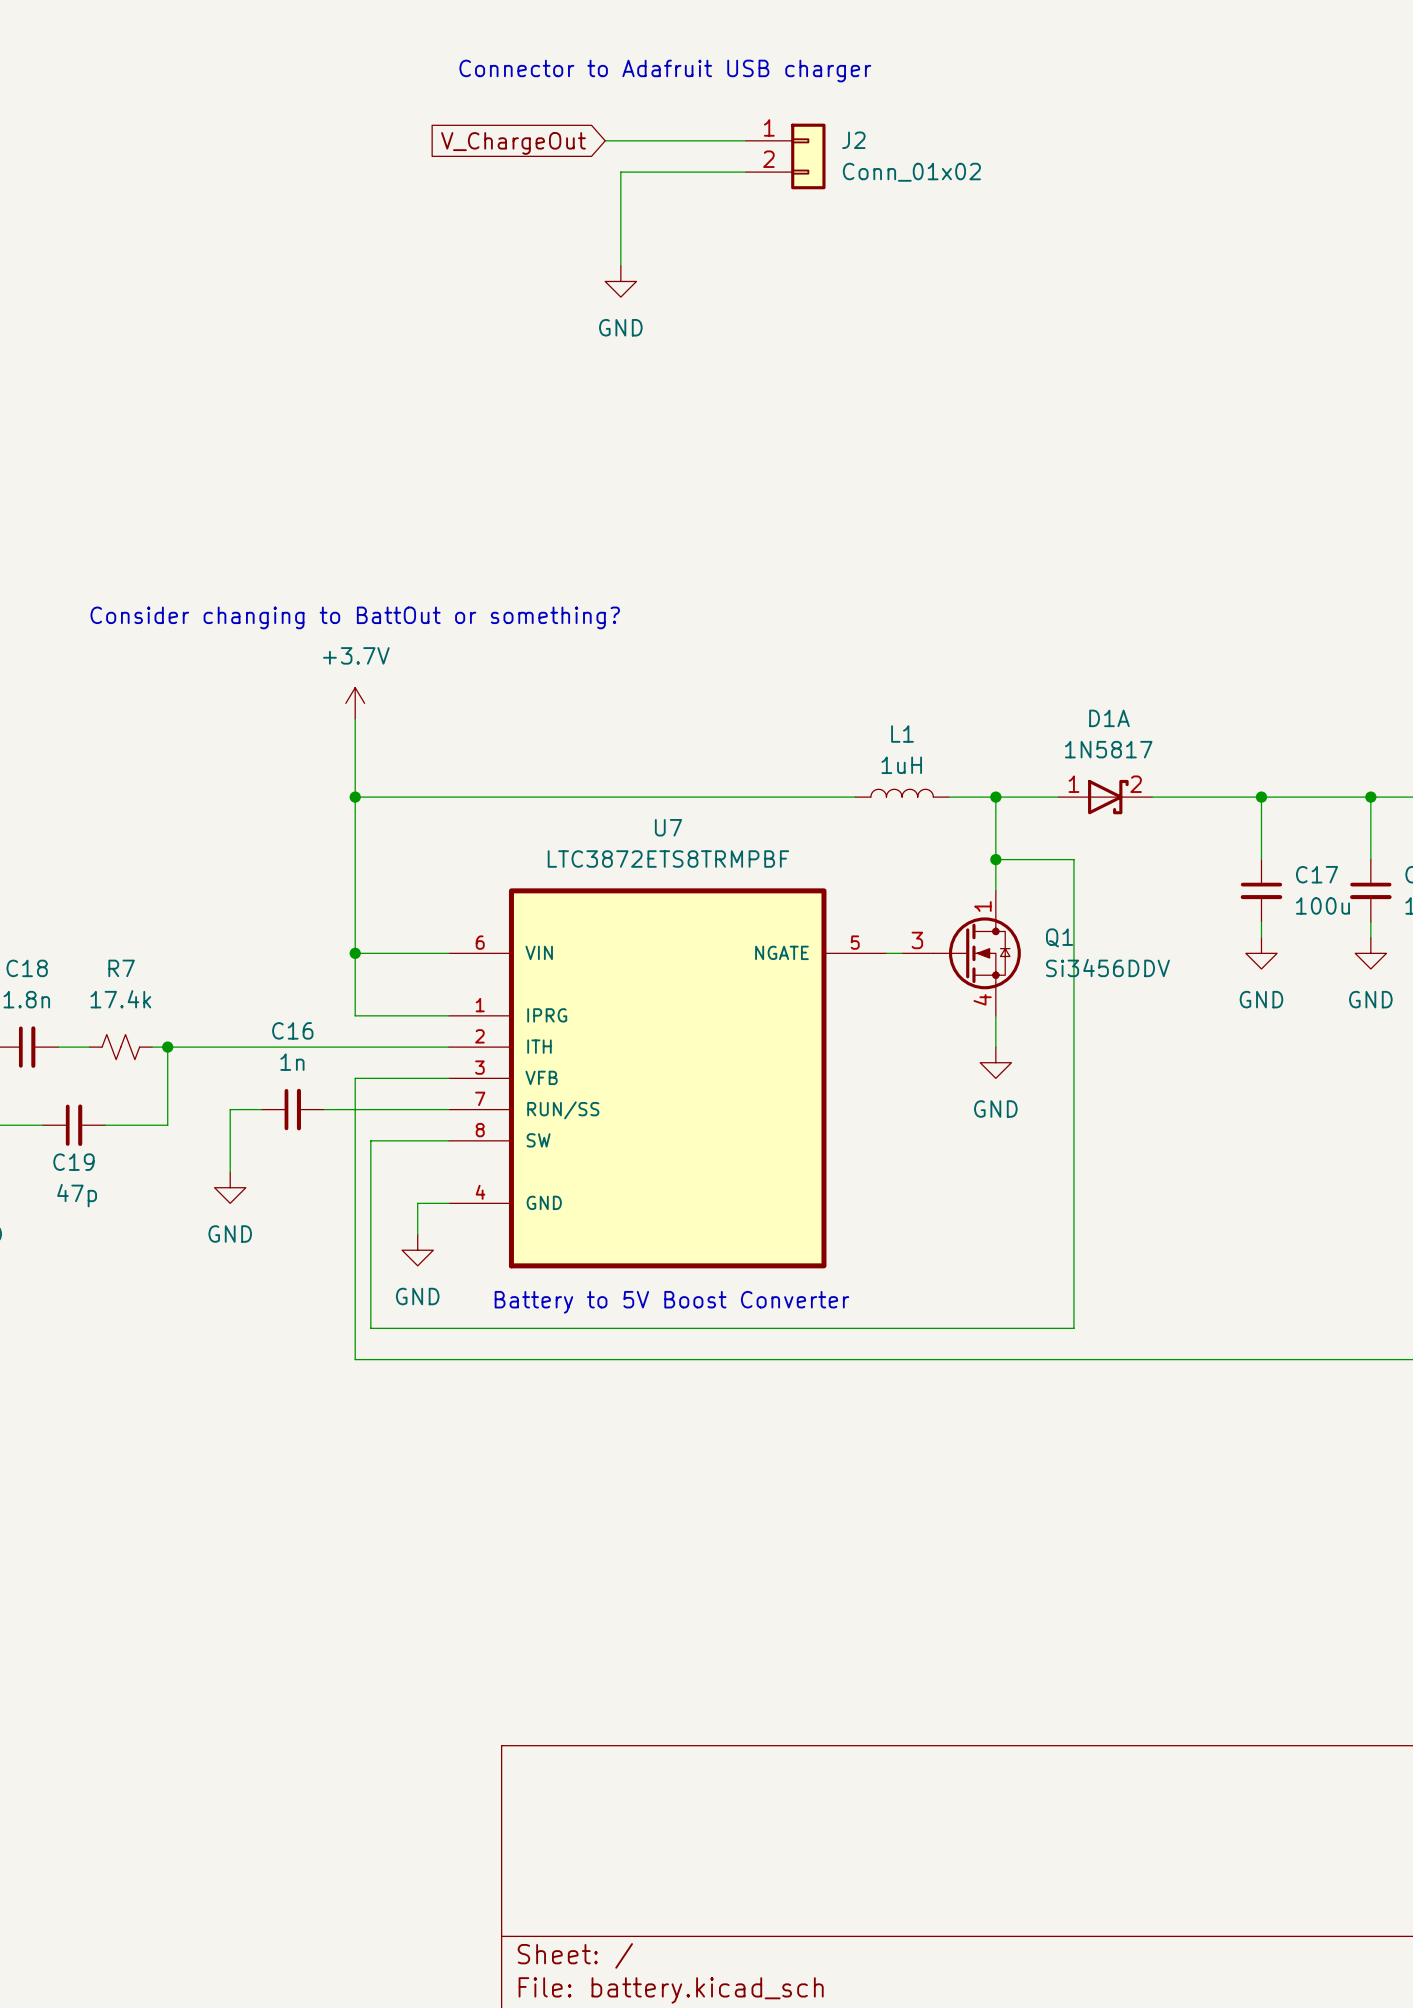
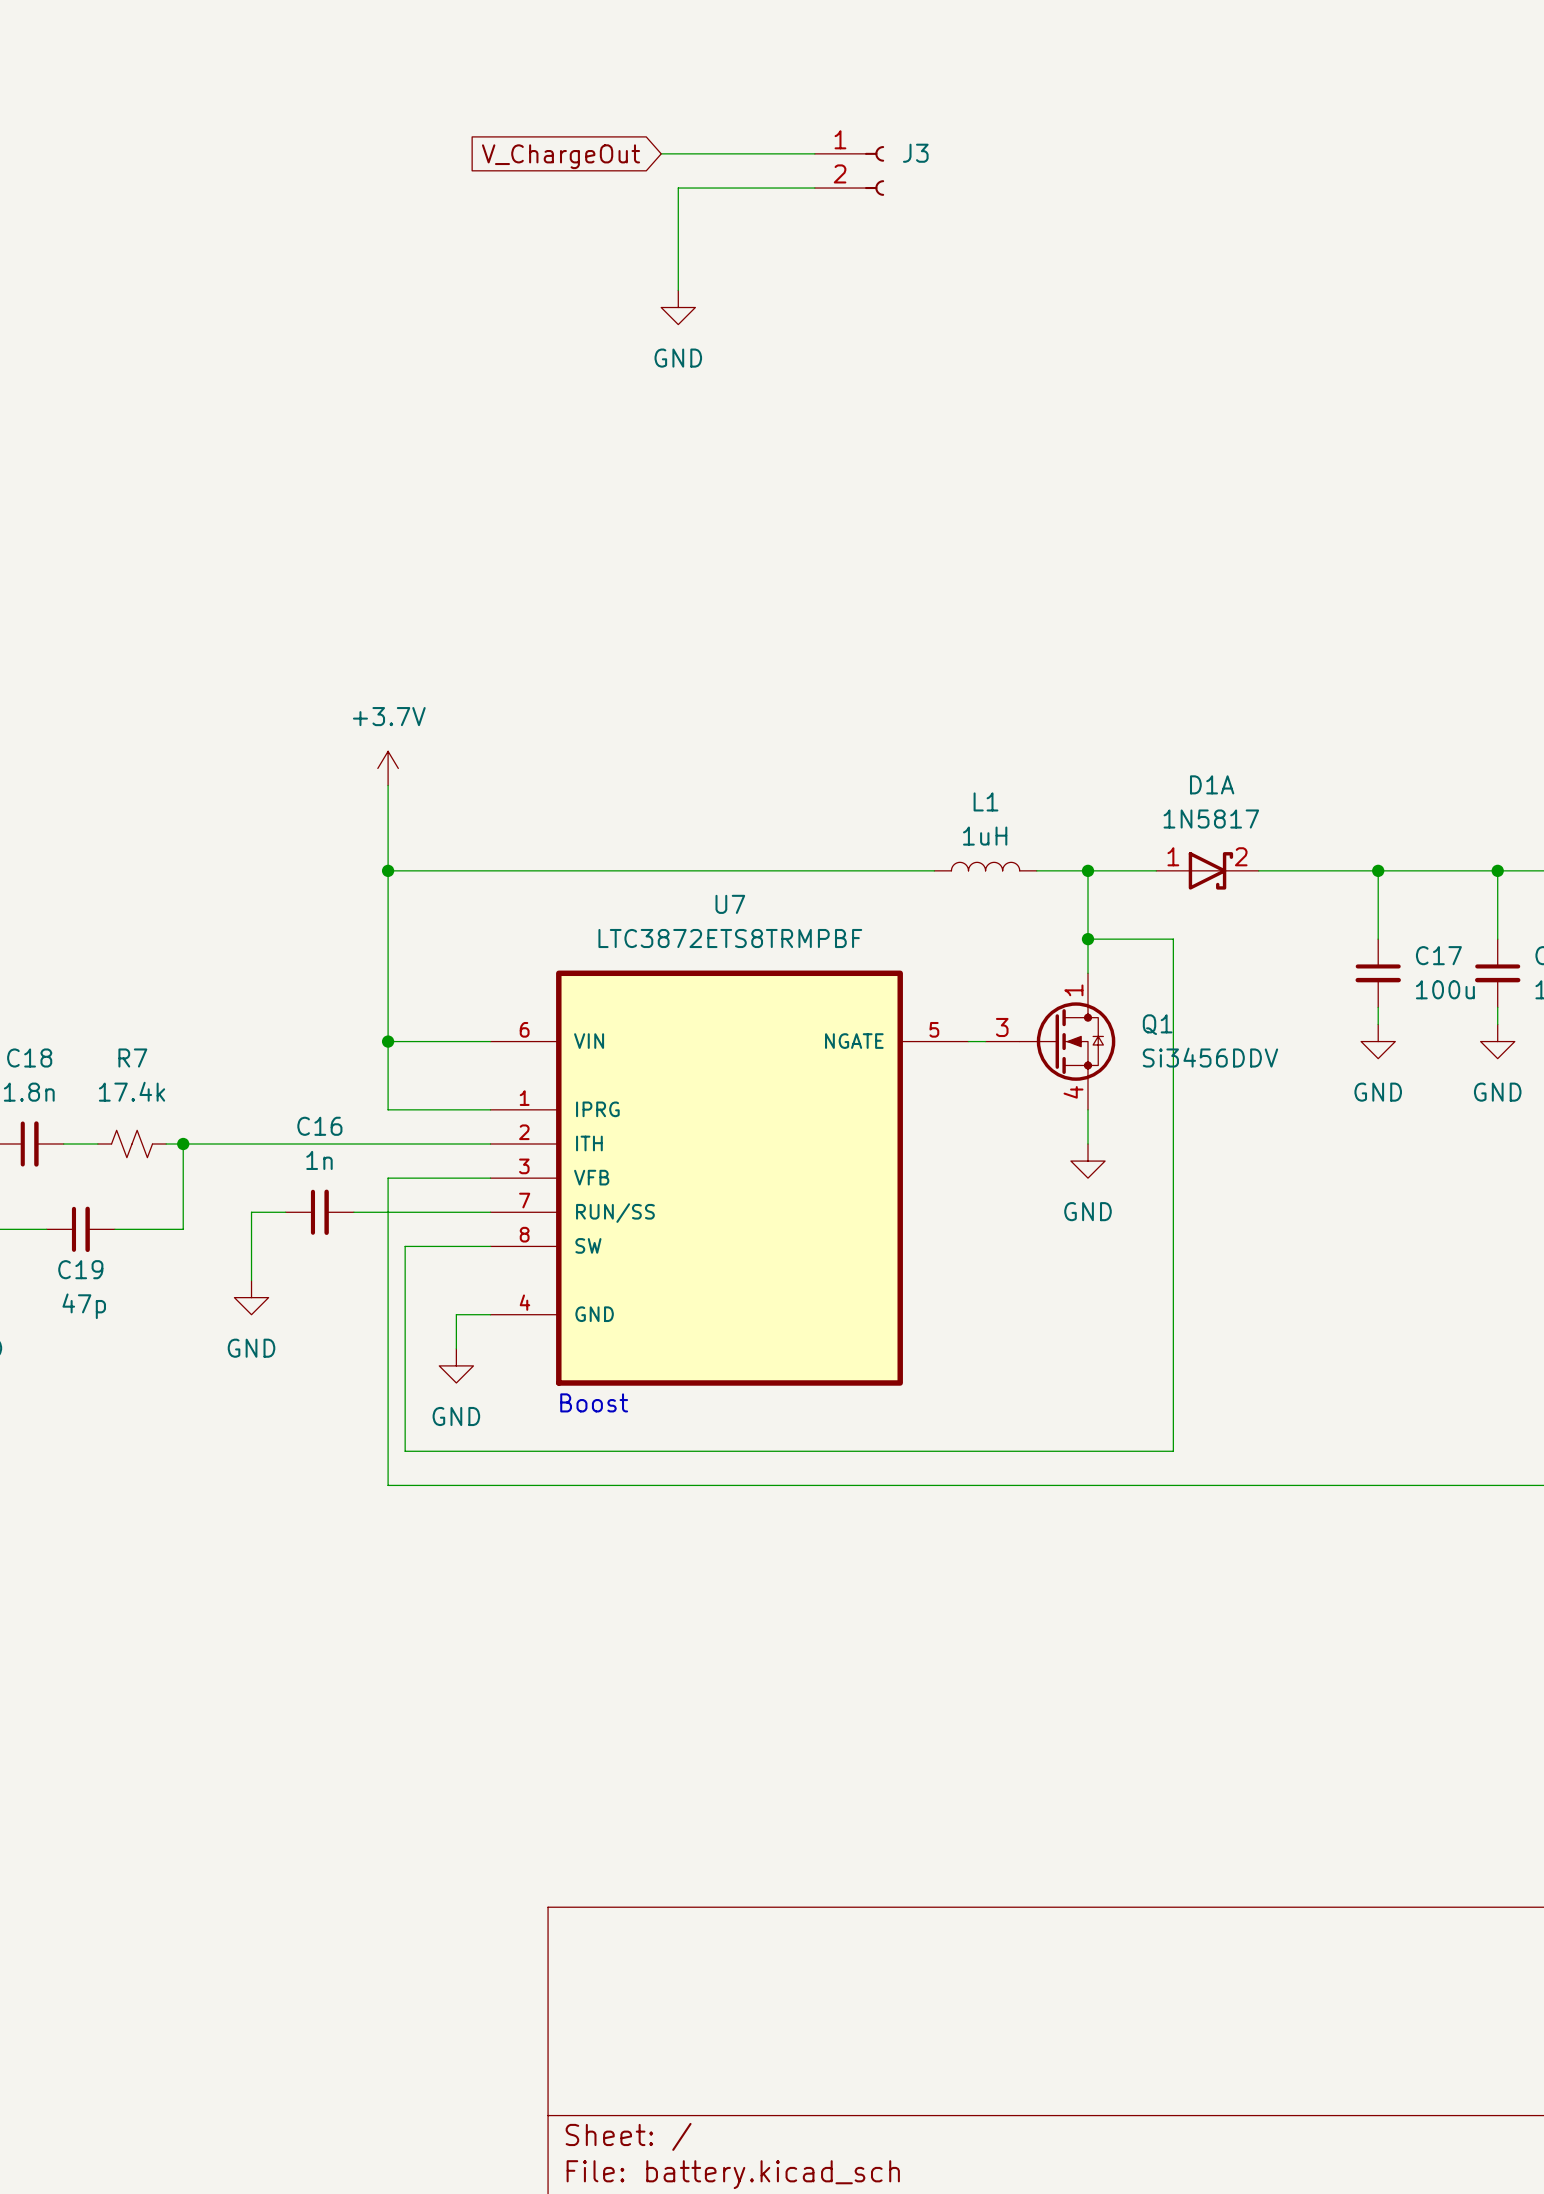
text: Connector to Adafruit USB charger (665, 71) -> none
J3: none -> (849, 170)
J2: Conn_01x02 (785, 156) -> none
text: Consider changing to BattOut or something? (355, 617) -> none
text: none -> Boost (594, 1402)
text: Battery to 5V Boost Converter (671, 1302) -> none

